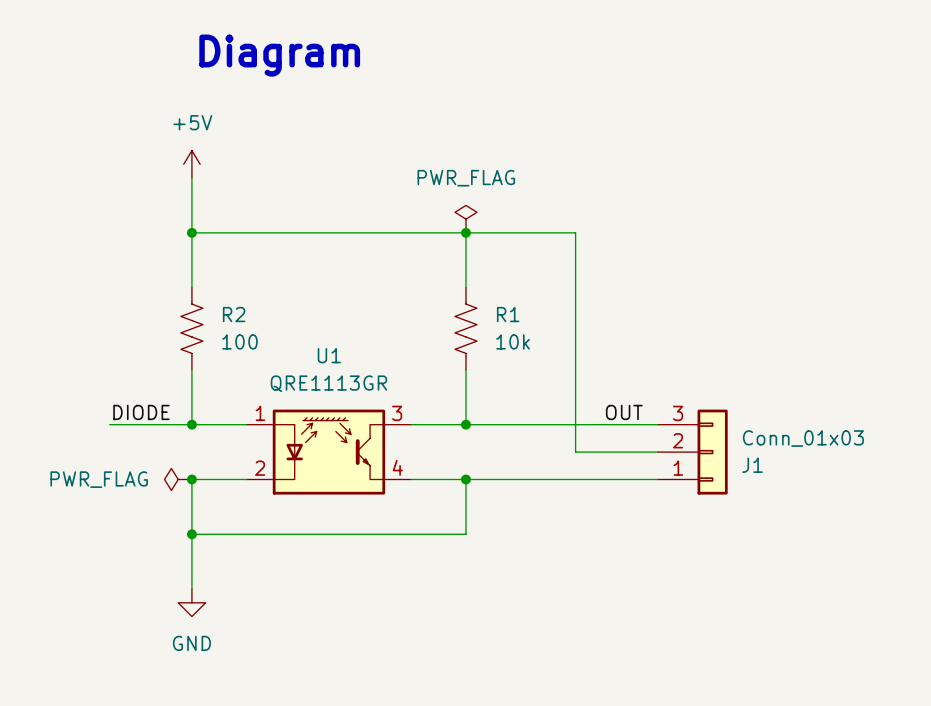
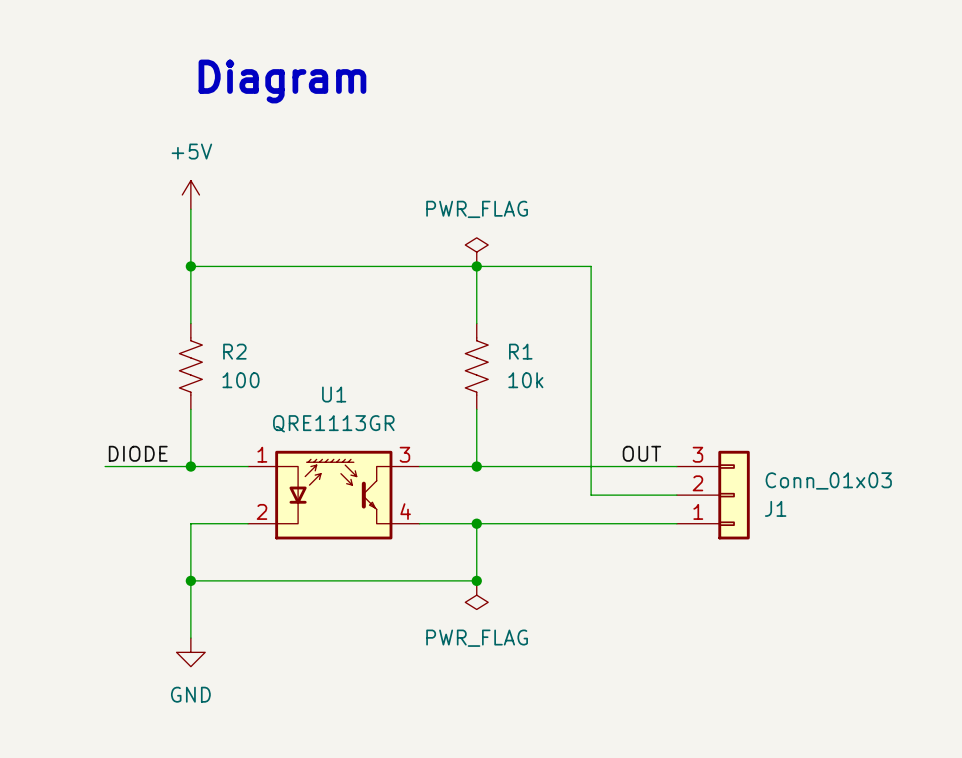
power symbol: PWR_FLAG (178, 479) -> none
junction: (191, 479) -> none
junction: none -> (476, 580)
power symbol: none -> PWR_FLAG (476, 595)

